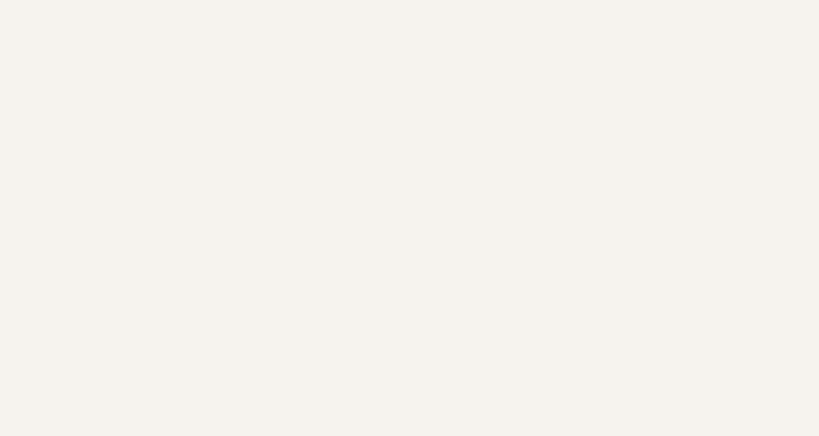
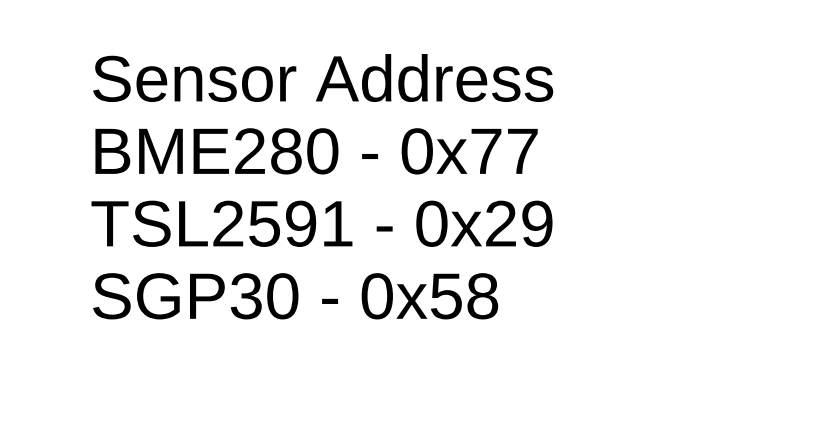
text: none -> Sensor Address (323, 78)
text: none -> BME280 - 0x77 (316, 151)
text: none -> TSL2591 - 0x29 (322, 223)
text: none -> SGP30 - 0x58 (295, 296)

